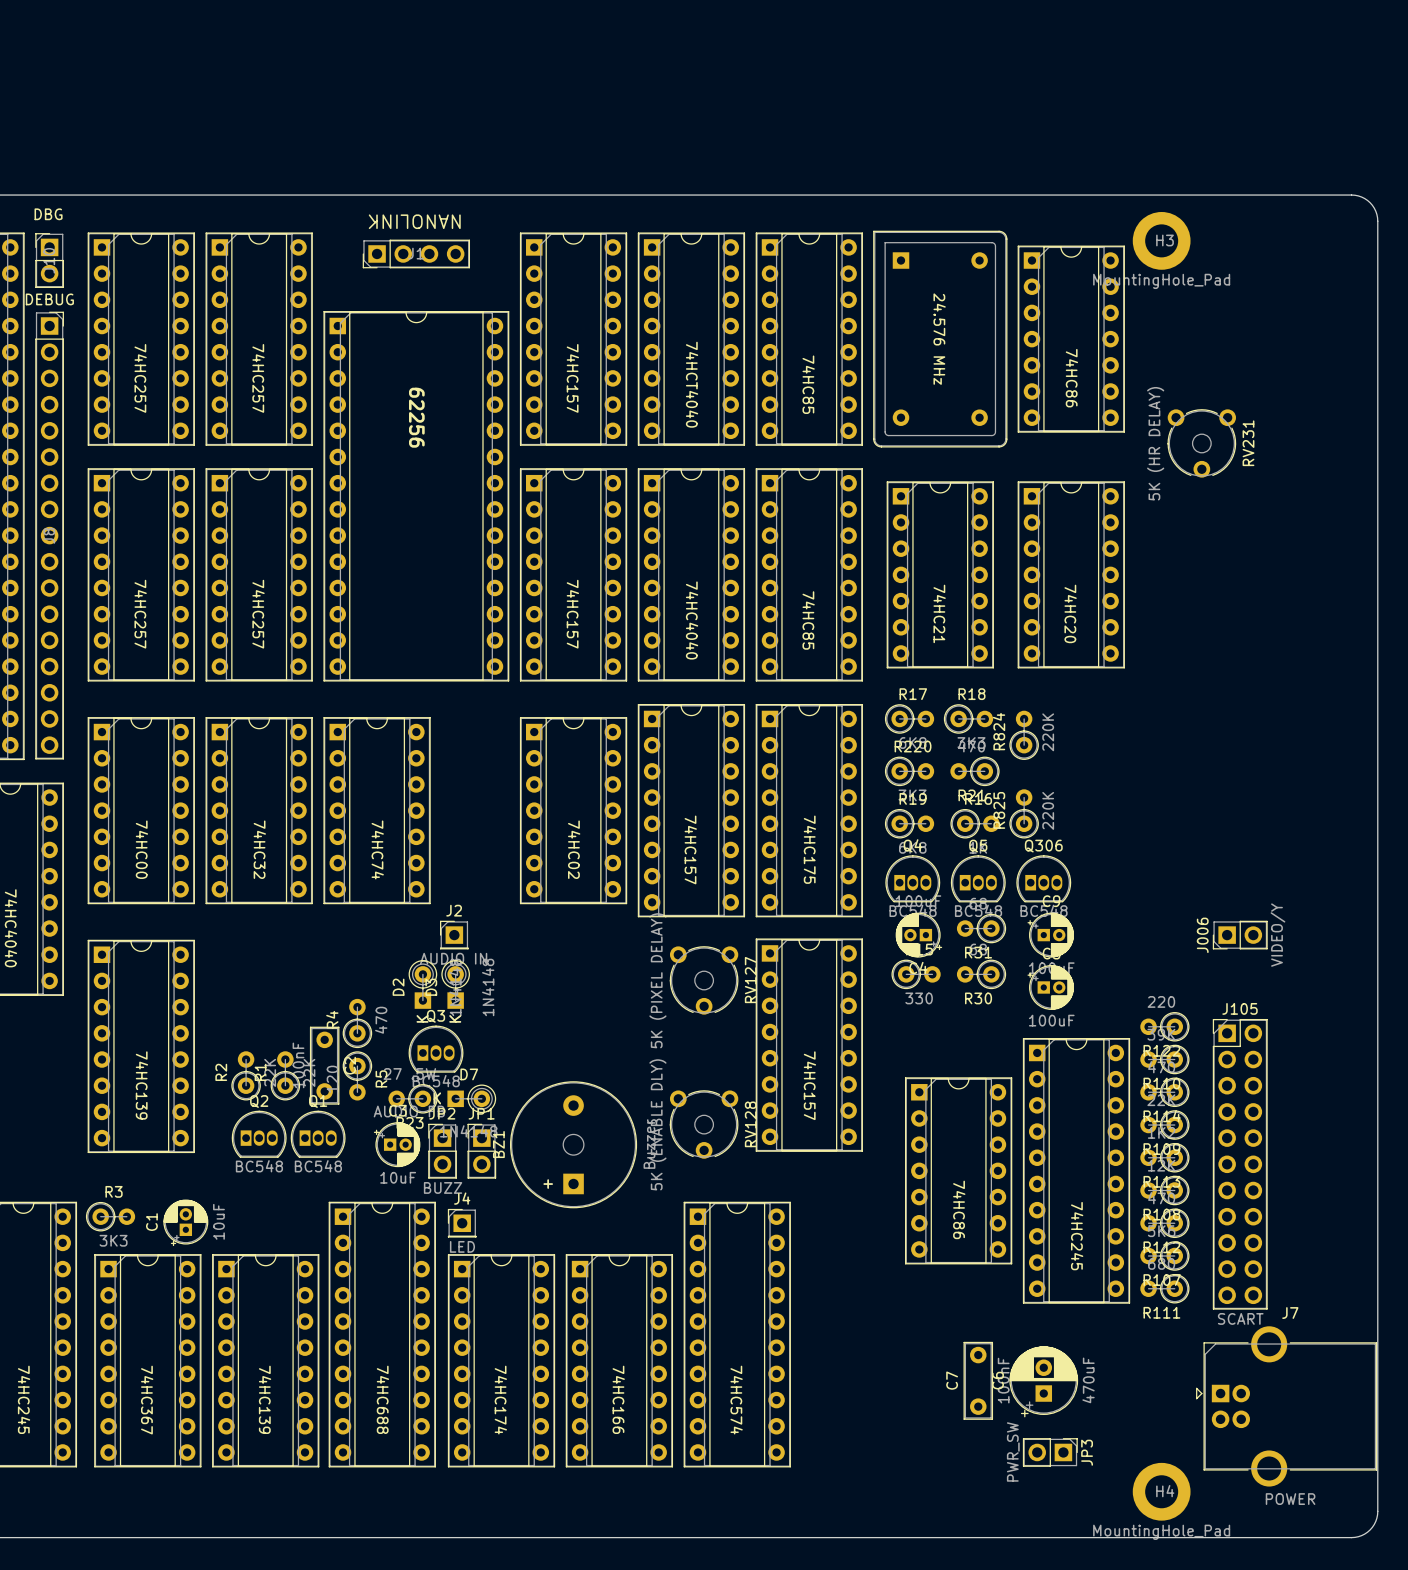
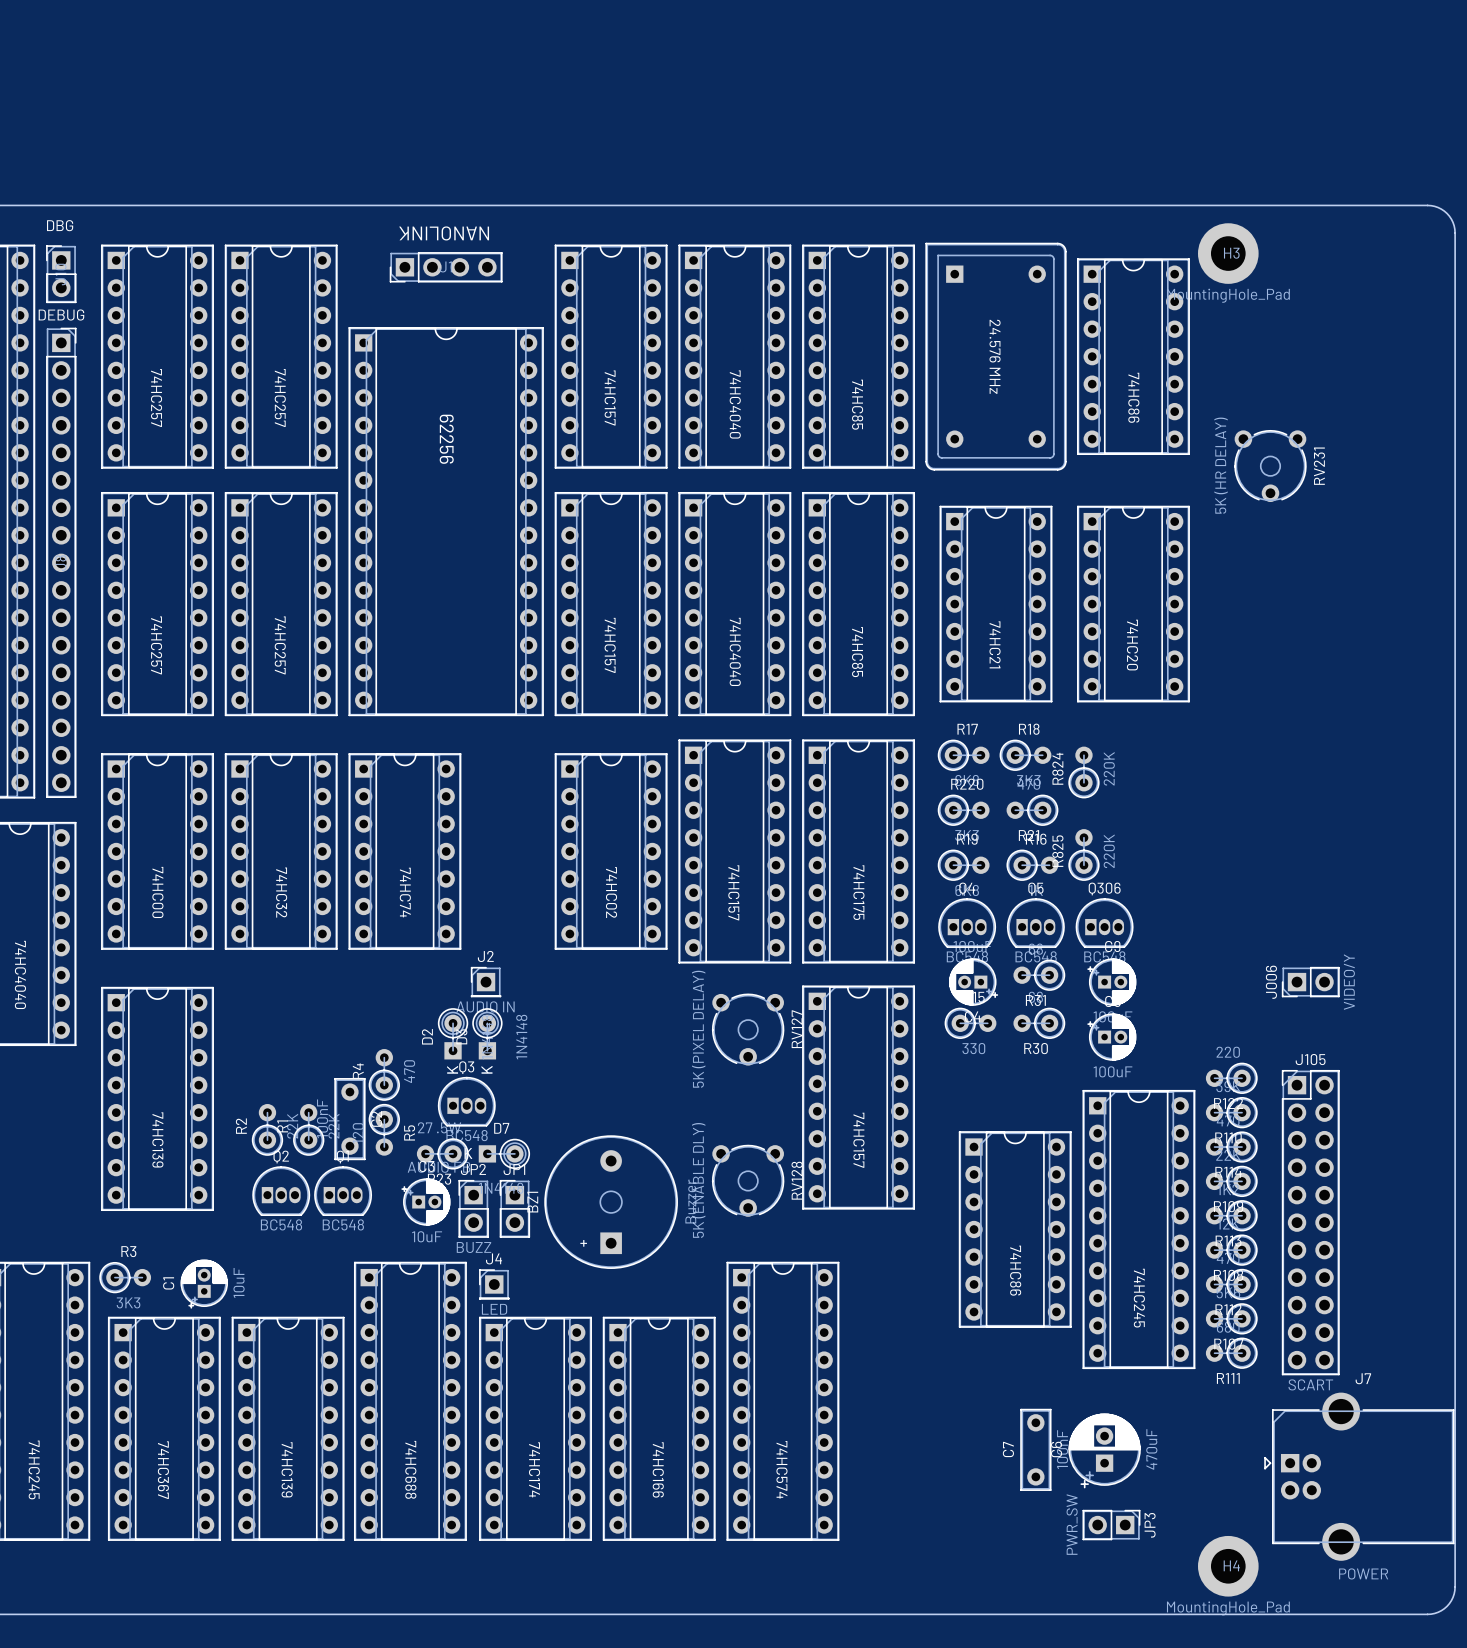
part value: 74HCT4040 (692, 384) -> 74HC4040 (735, 404)

